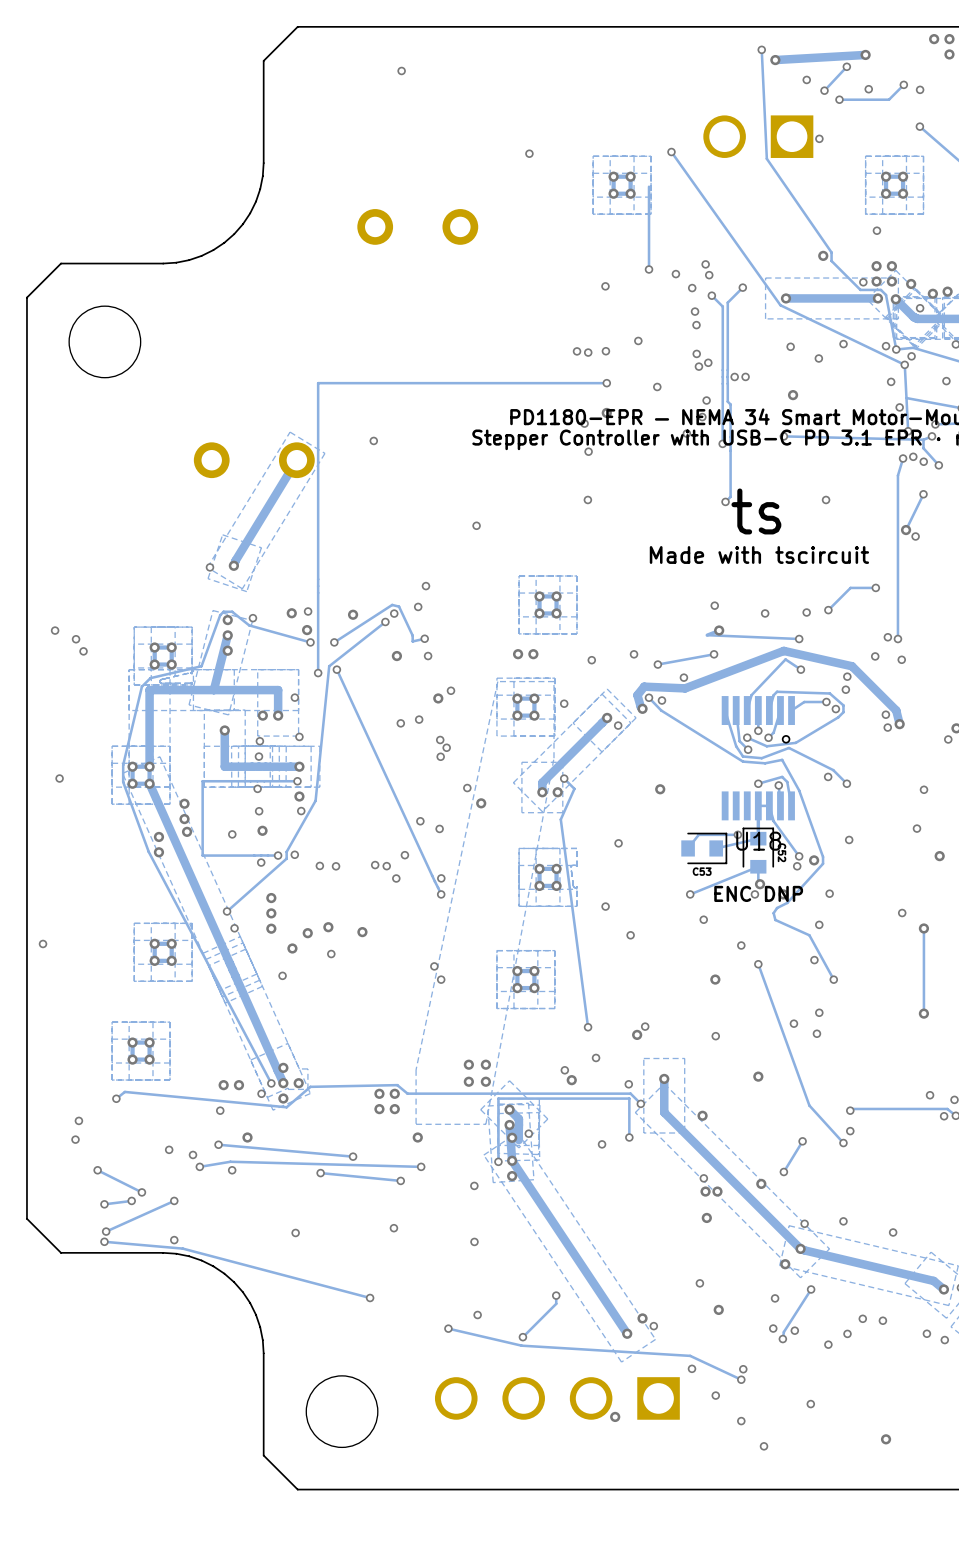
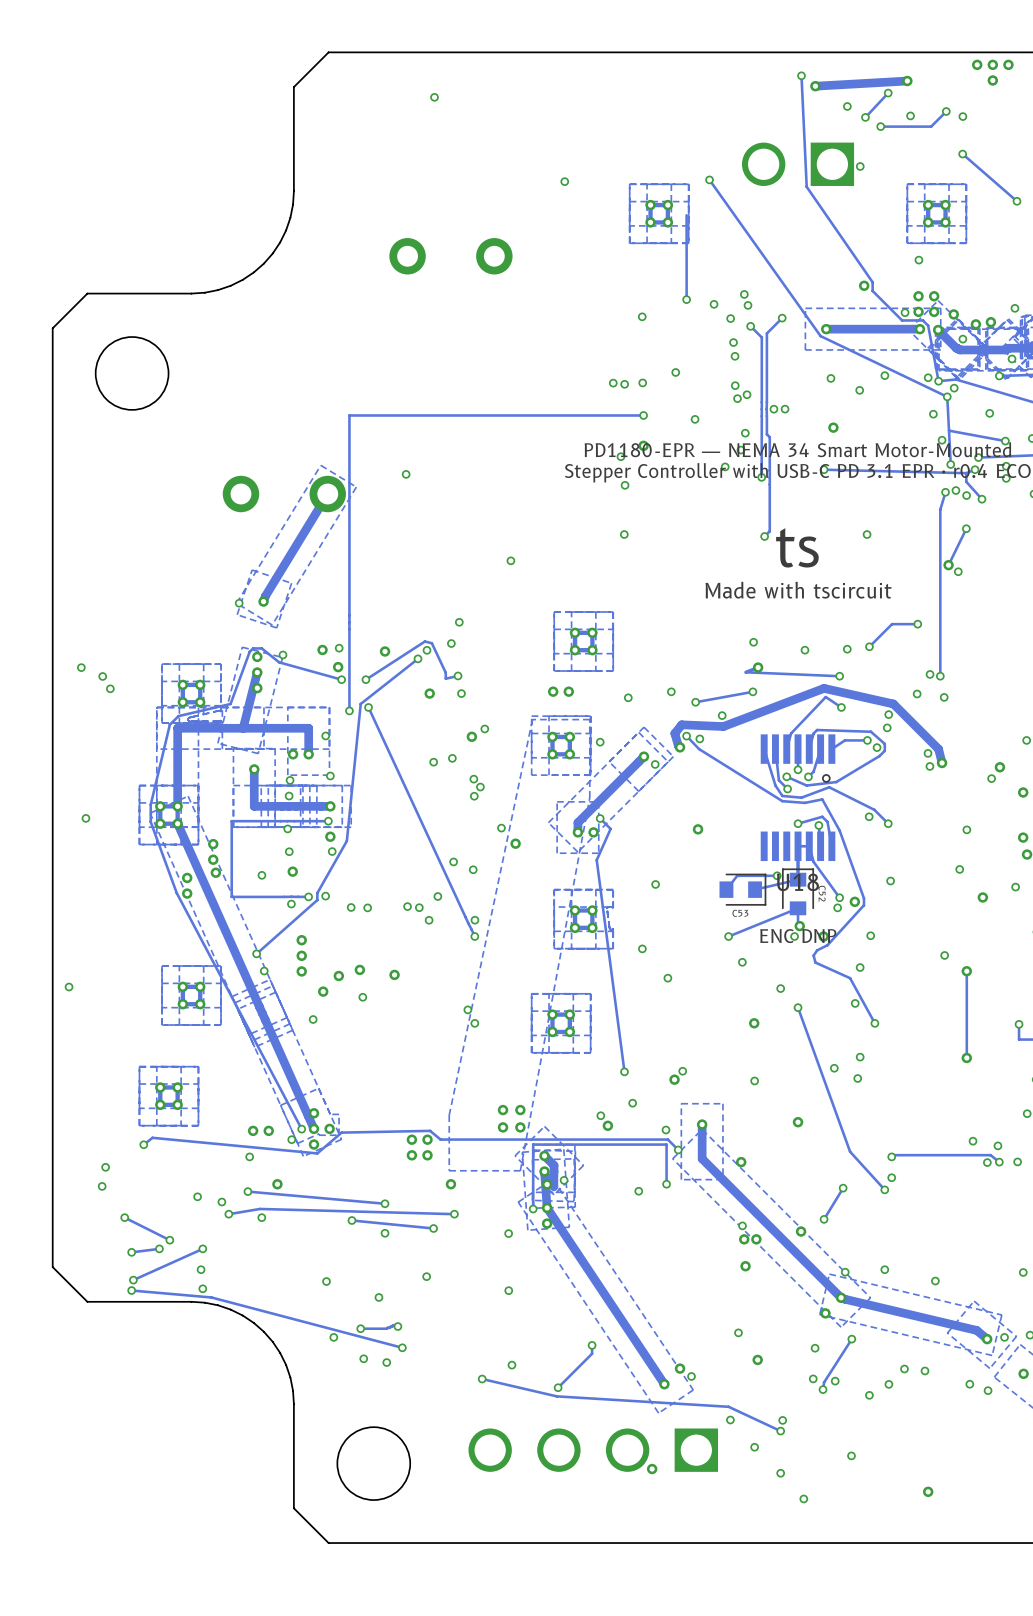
via: none -> (385, 1233)
via: none -> (201, 1269)
via: none -> (378, 1297)
track: none -> (394, 1325) (386, 1328) (360, 1328)
via: none -> (397, 1326)
via: none -> (360, 1328)
via: none -> (333, 1337)
via: none -> (363, 1358)
via: none -> (386, 1362)

